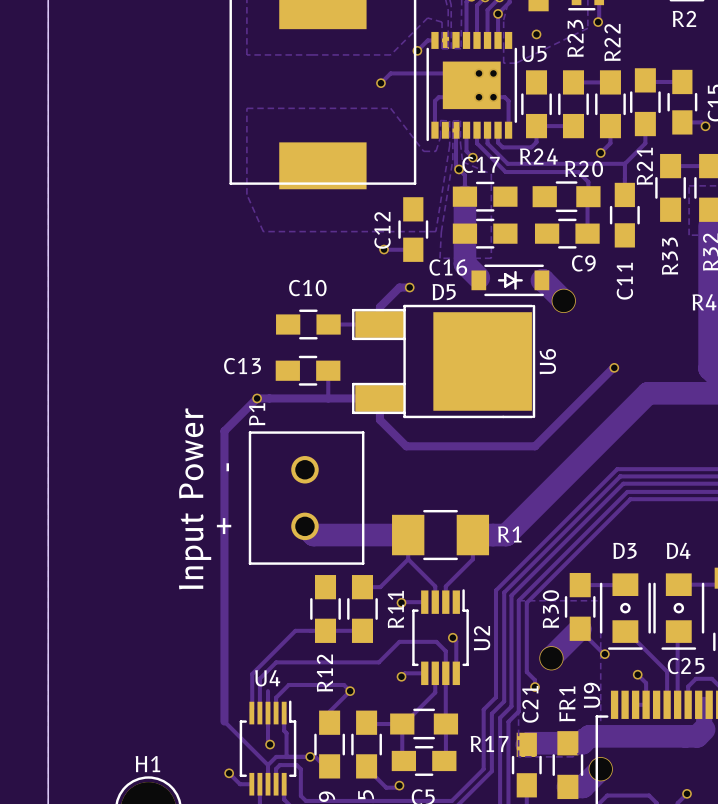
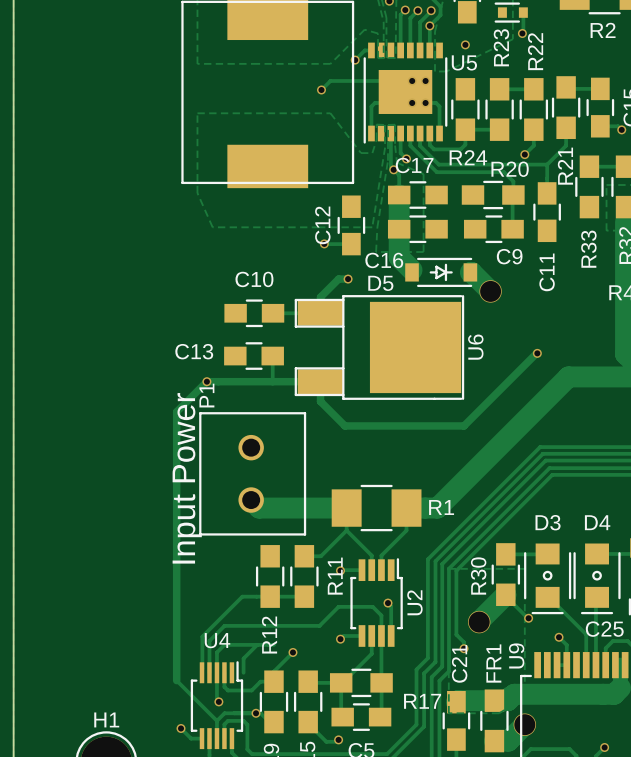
text: - (227, 467) -> none
text position: Input Power (195, 498) -> Input Power (187, 478)
text: + (224, 526) -> none
track: none -> (257, 644) (243, 658) (243, 672)
track: none -> (273, 644) (224, 644) (216, 652)
track: (350, 691) (343, 684) (288, 684) (276, 697) (276, 713) -> (273, 681) (260, 681) (251, 690) (227, 690) (224, 686) (224, 672)
track: (284, 713) (286, 756) -> none

